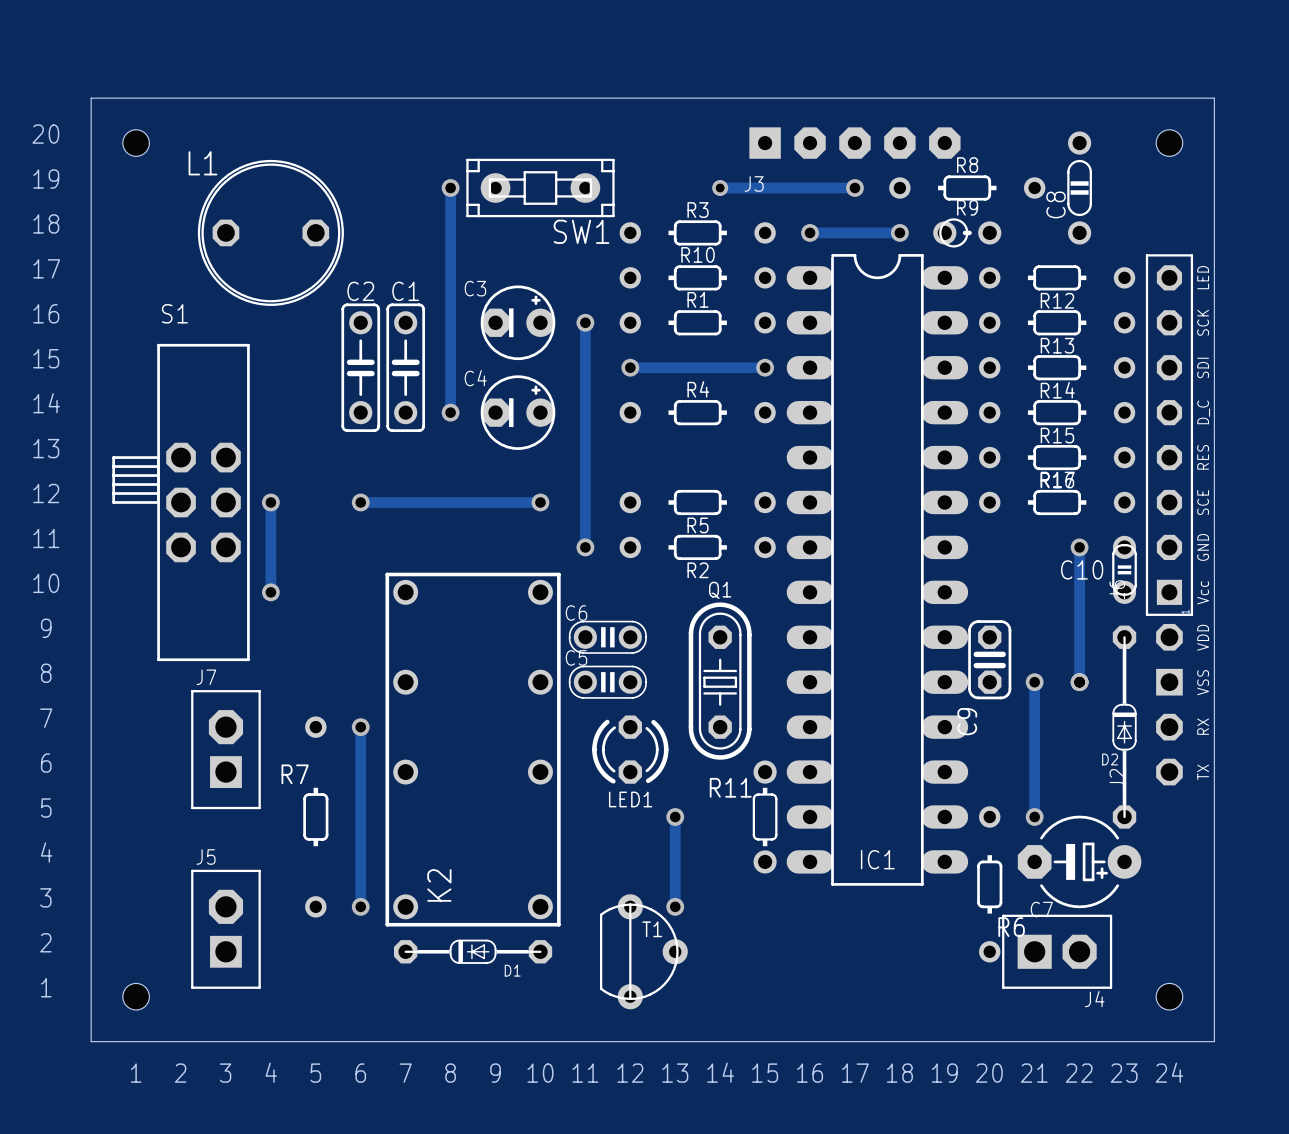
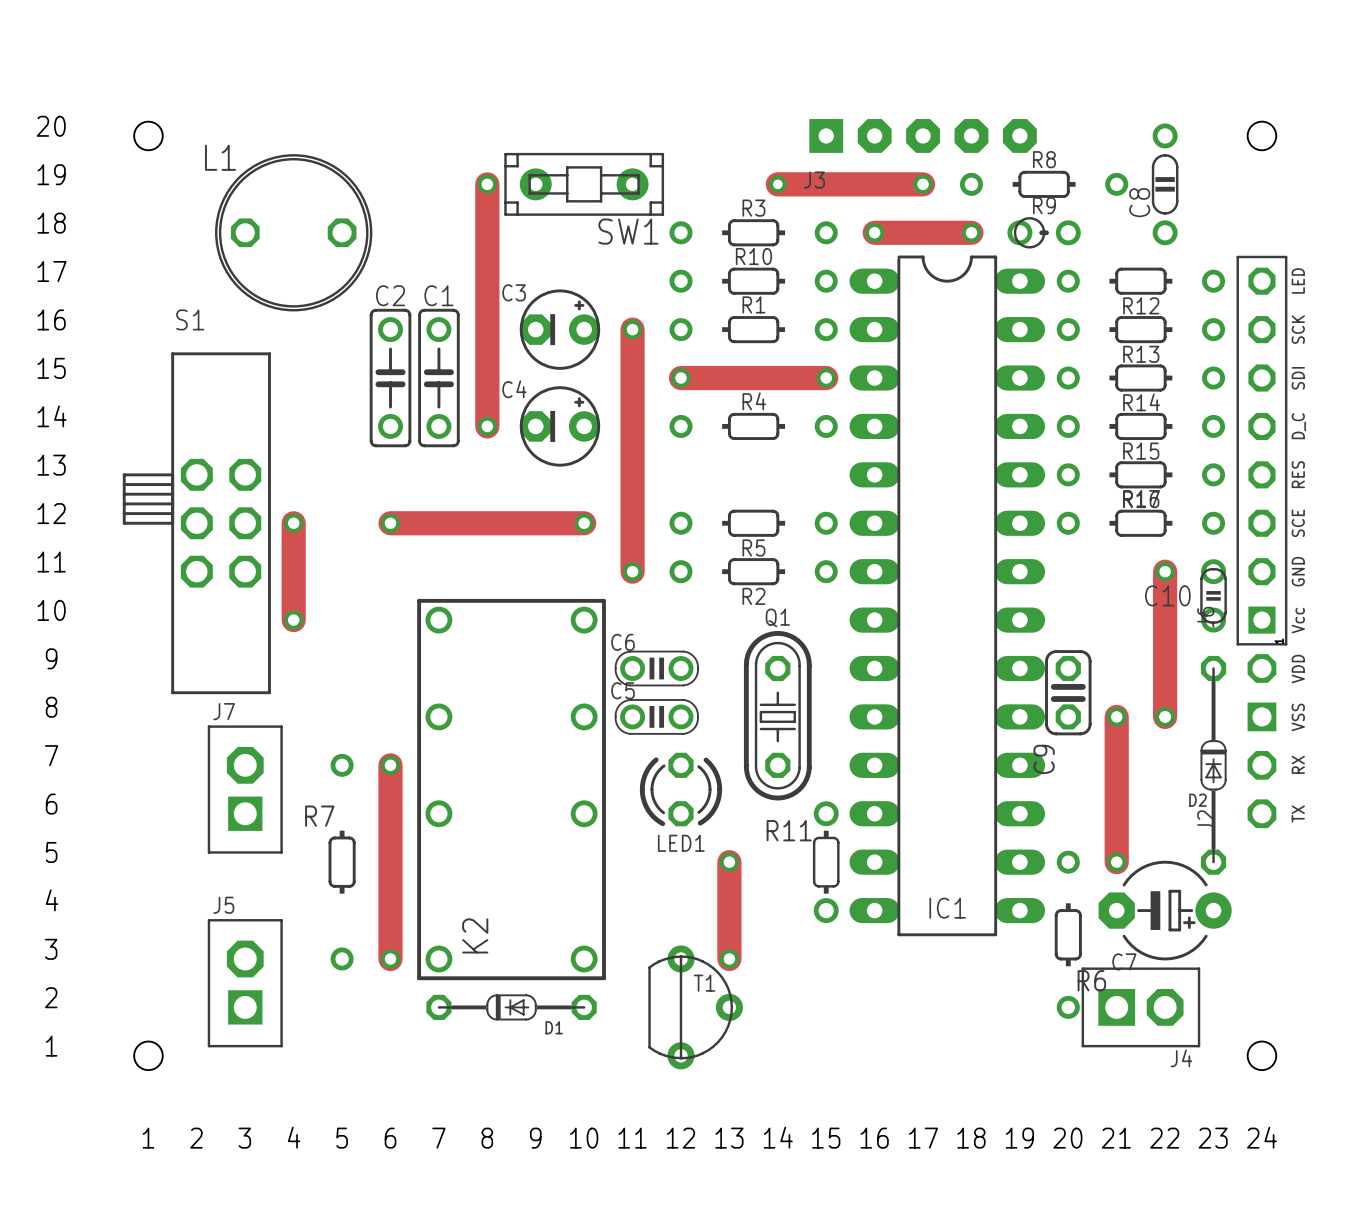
board edge: (91, 98) (1214, 98) (1214, 1041) (91, 1041) (91, 98) -> none
track width: thin (450, 188) (450, 412) -> thick (487, 184) (487, 426)
track width: thin (720, 188) (854, 188) -> thick (777, 184) (923, 184)
track width: thin (810, 232) (899, 232) -> thick (874, 232) (971, 232)
track width: thin (585, 322) (585, 547) -> thick (632, 329) (632, 571)
track width: thin (630, 367) (765, 367) -> thick (680, 378) (826, 378)
track width: thin (270, 502) (270, 592) -> thick (293, 523) (293, 620)
track width: thin (360, 502) (540, 502) -> thick (390, 523) (584, 523)
track width: thin (1079, 547) (1079, 682) -> thick (1165, 571) (1165, 716)
track width: thin (1034, 682) (1034, 816) -> thick (1116, 716) (1116, 862)
track width: thin (360, 727) (360, 906) -> thick (390, 765) (390, 958)
track width: thin (675, 816) (675, 906) -> thick (729, 862) (729, 958)

